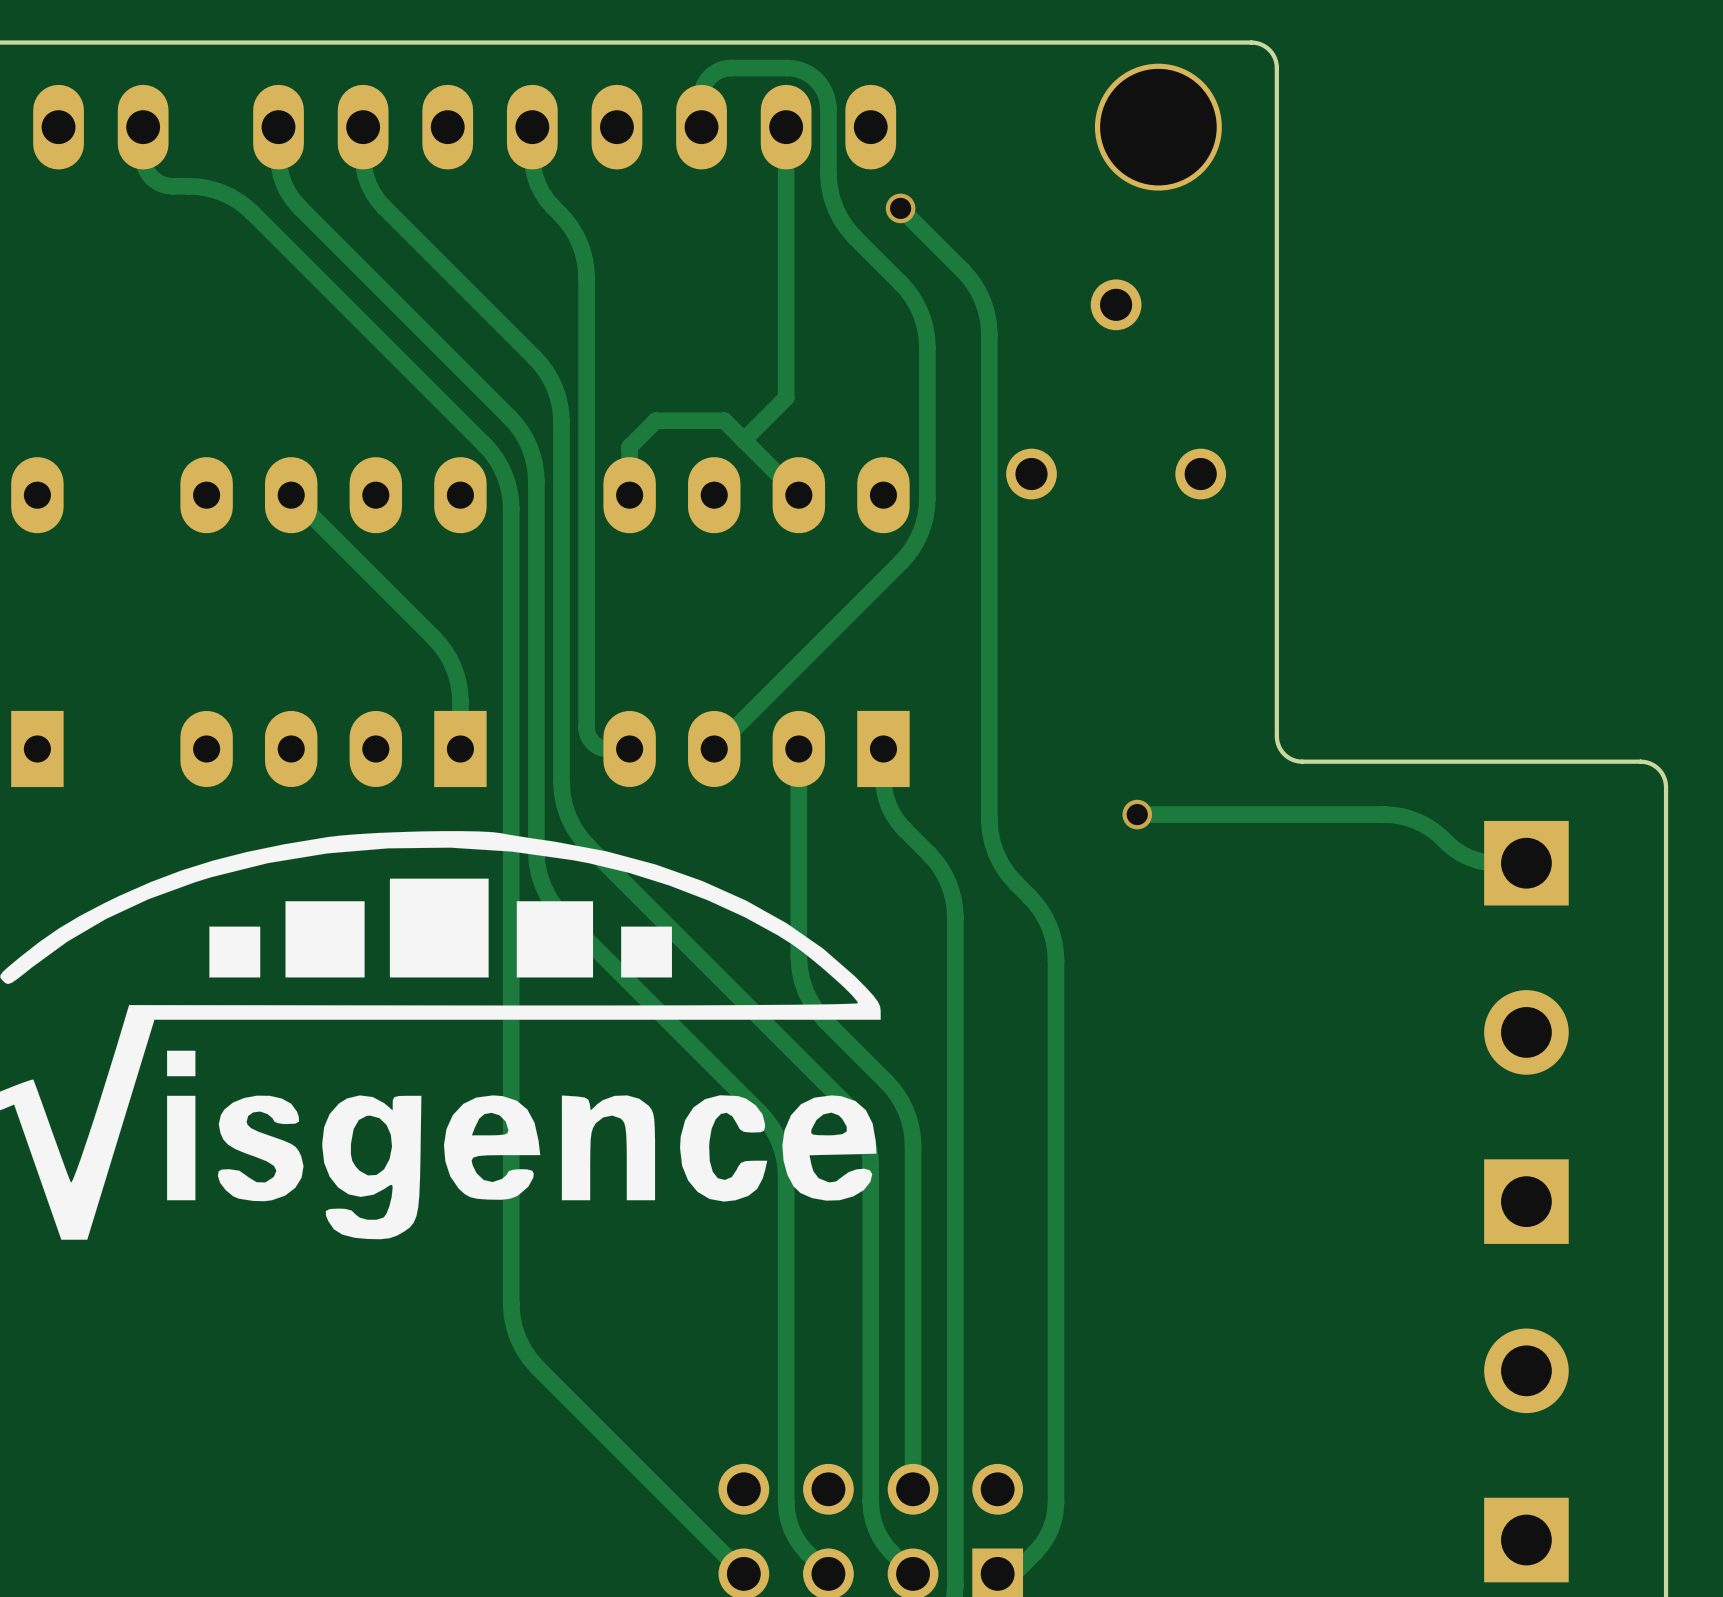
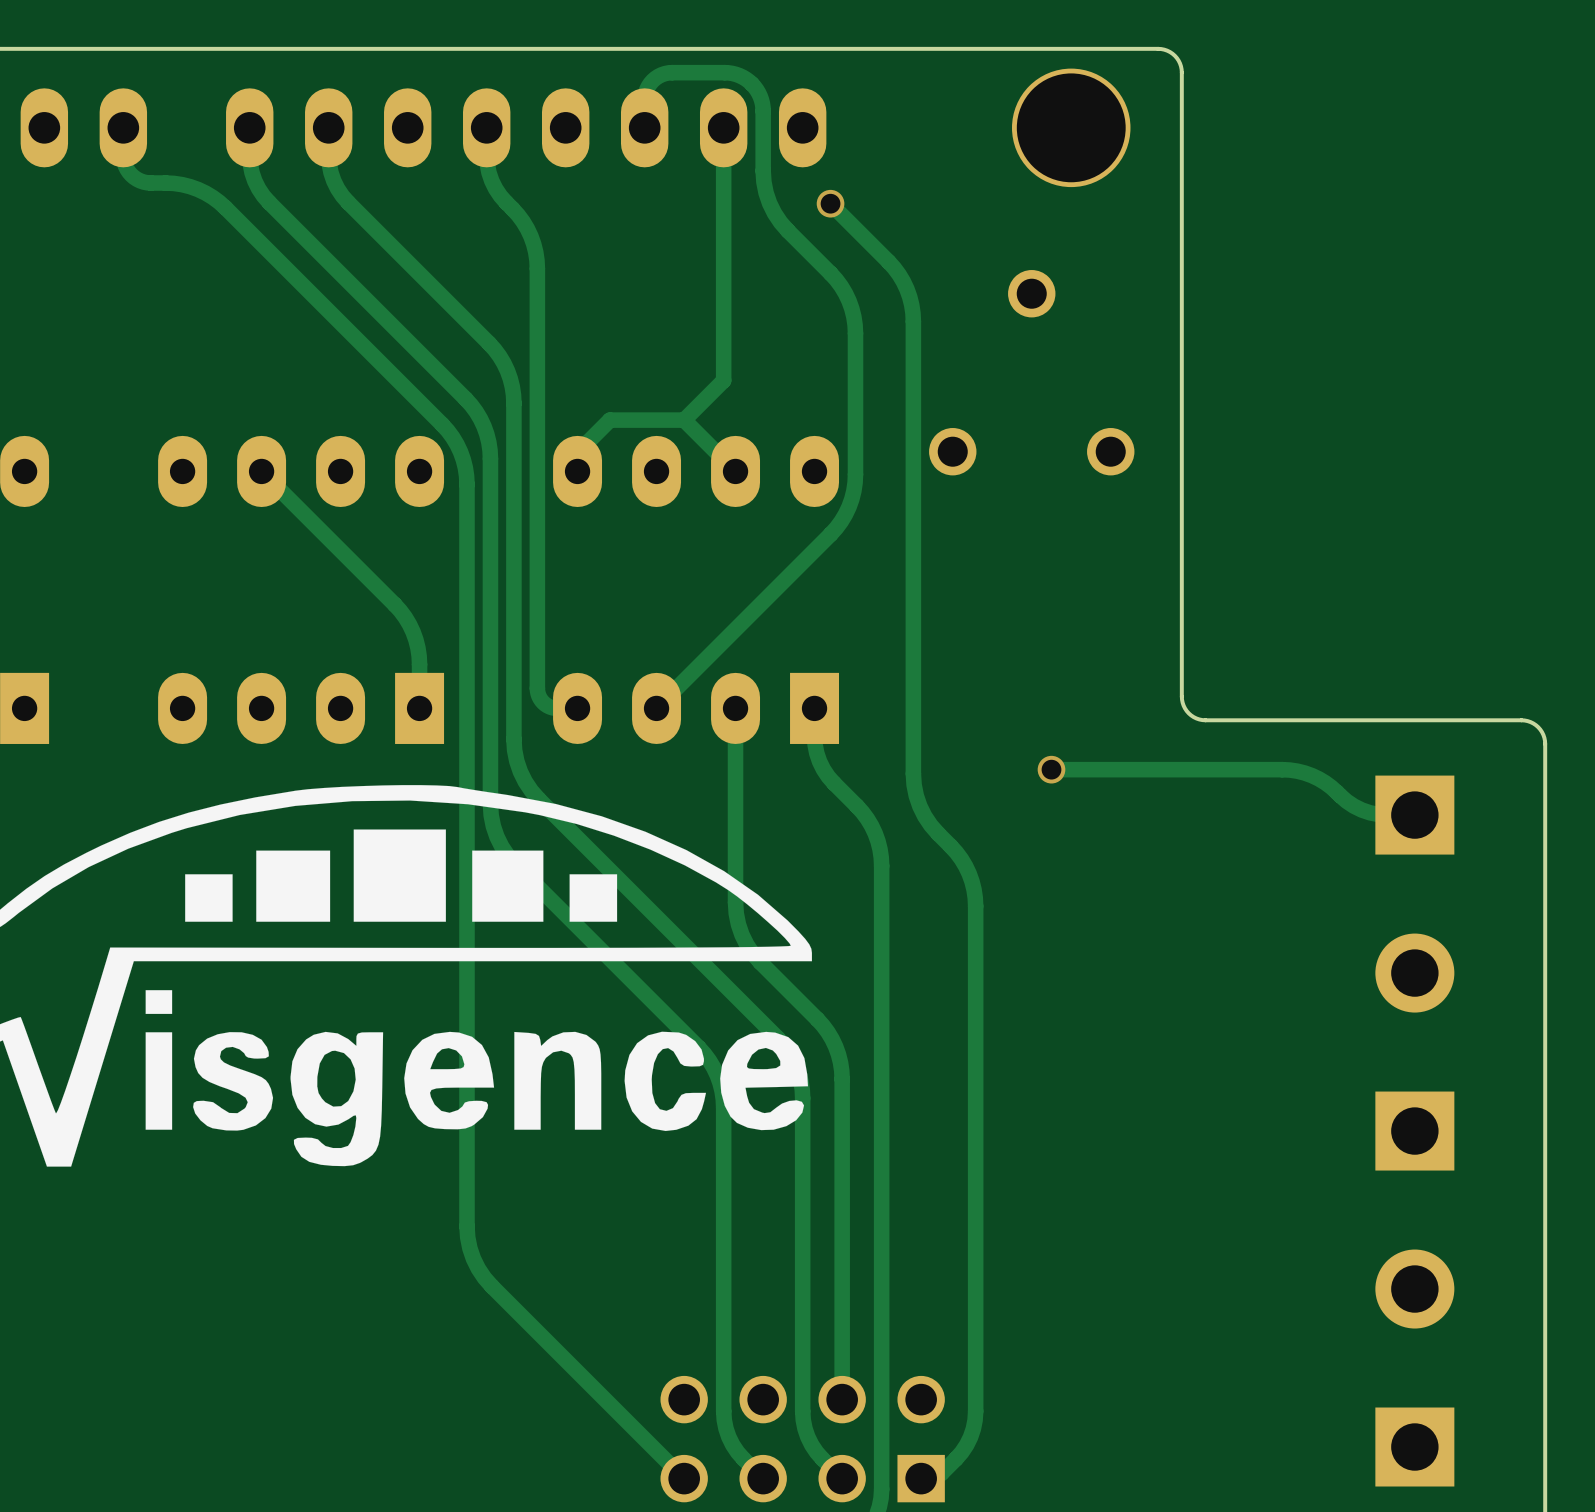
track: (743, 440) (724, 420) (655, 420) (629, 446) (629, 474) -> (684, 420) (609, 420) (577, 452)

